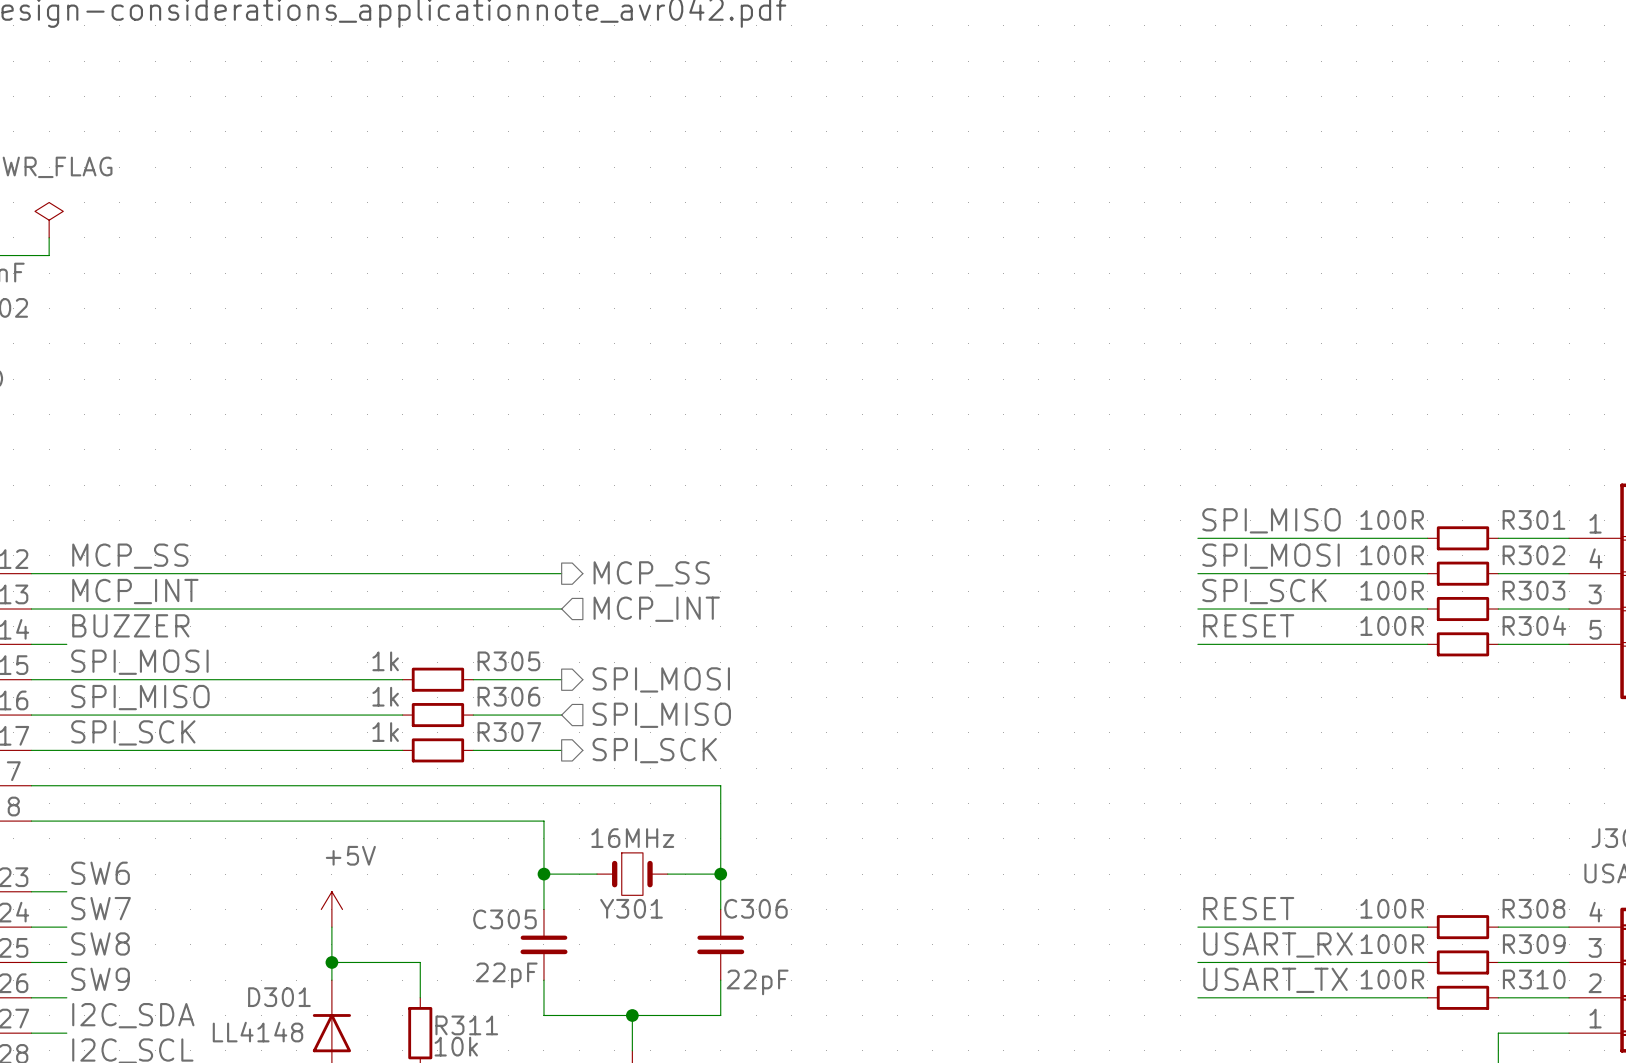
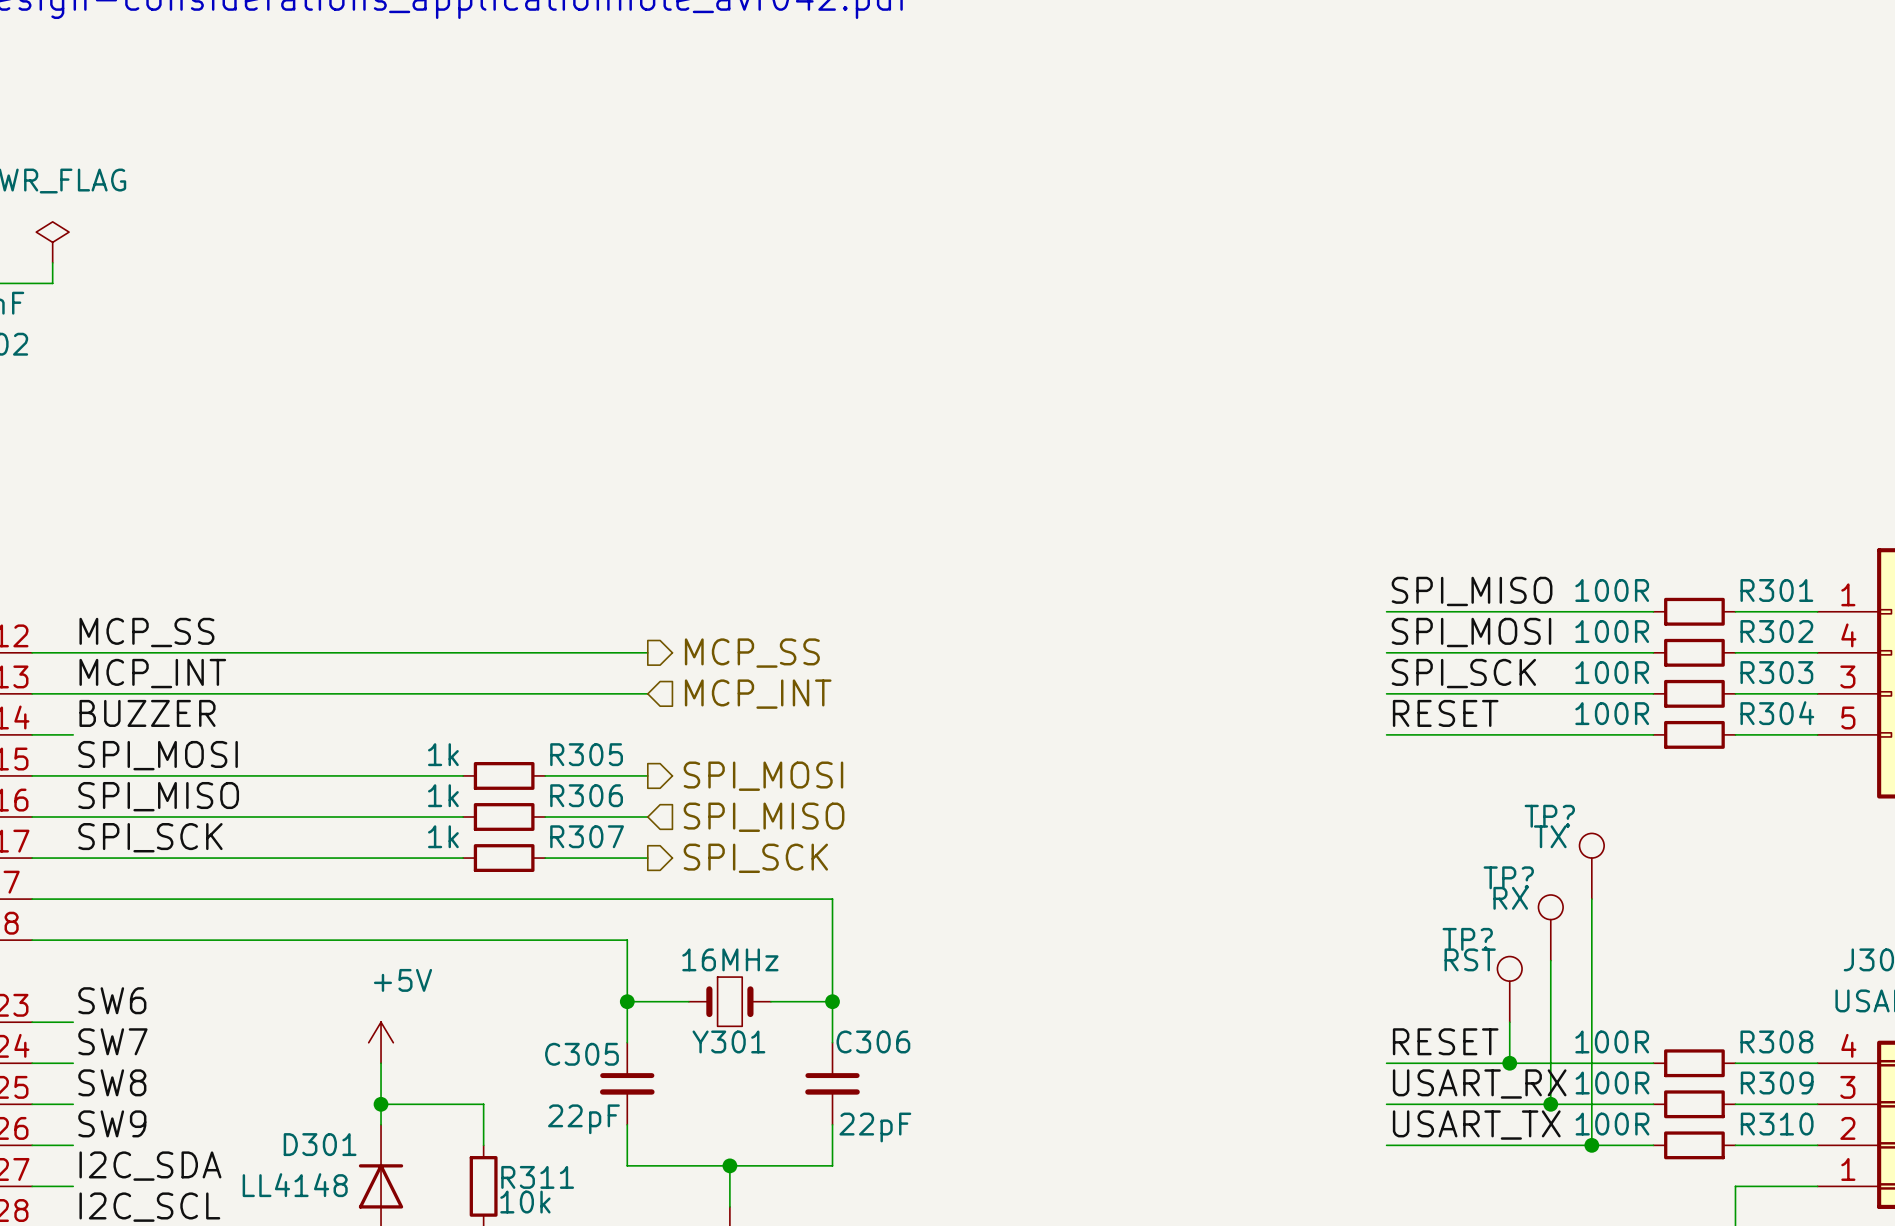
TP?: none -> TX (1591, 866)
wire: none -> (1591, 899) (1591, 1145)
TP?: none -> RX (1550, 927)
wire: none -> (1550, 960) (1550, 1104)
TP?: none -> RST (1509, 989)
wire: none -> (1509, 1022) (1509, 1063)
junction: none -> (1509, 1063)
junction: none -> (1550, 1104)
junction: none -> (1591, 1145)

